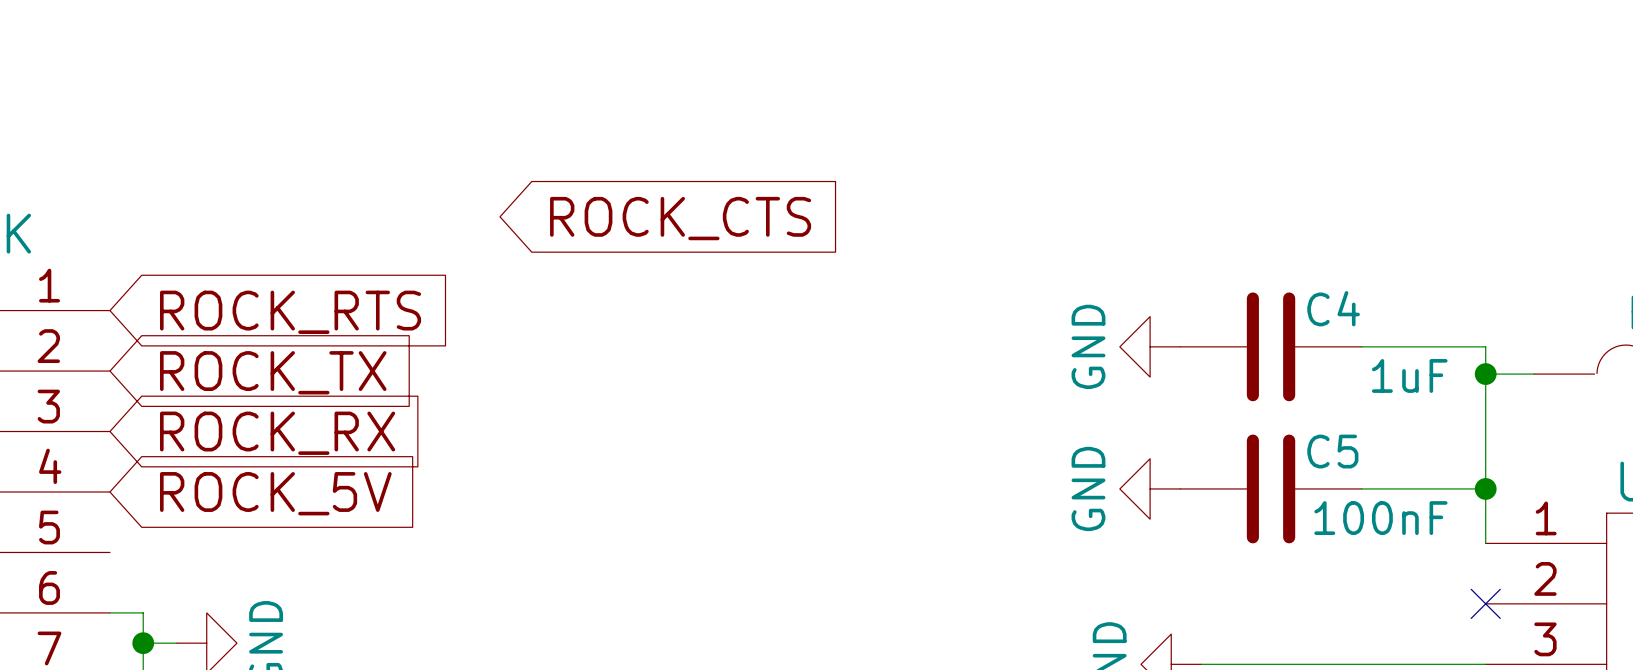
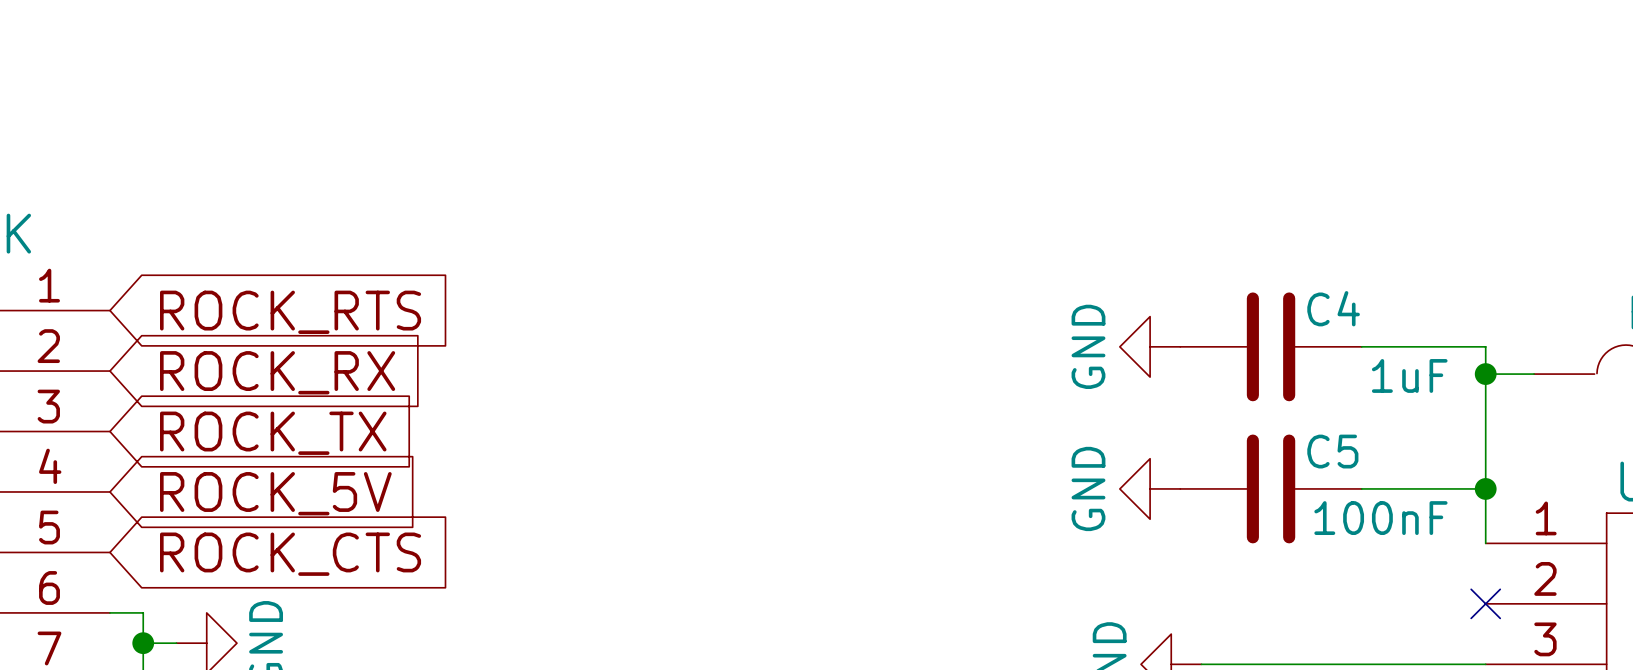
global label position: ROCK_CTS (680, 218) -> ROCK_CTS (290, 554)
global label: ROCK_TX (273, 372) -> ROCK_RX (277, 372)
global label: ROCK_RX (277, 433) -> ROCK_TX (273, 433)

